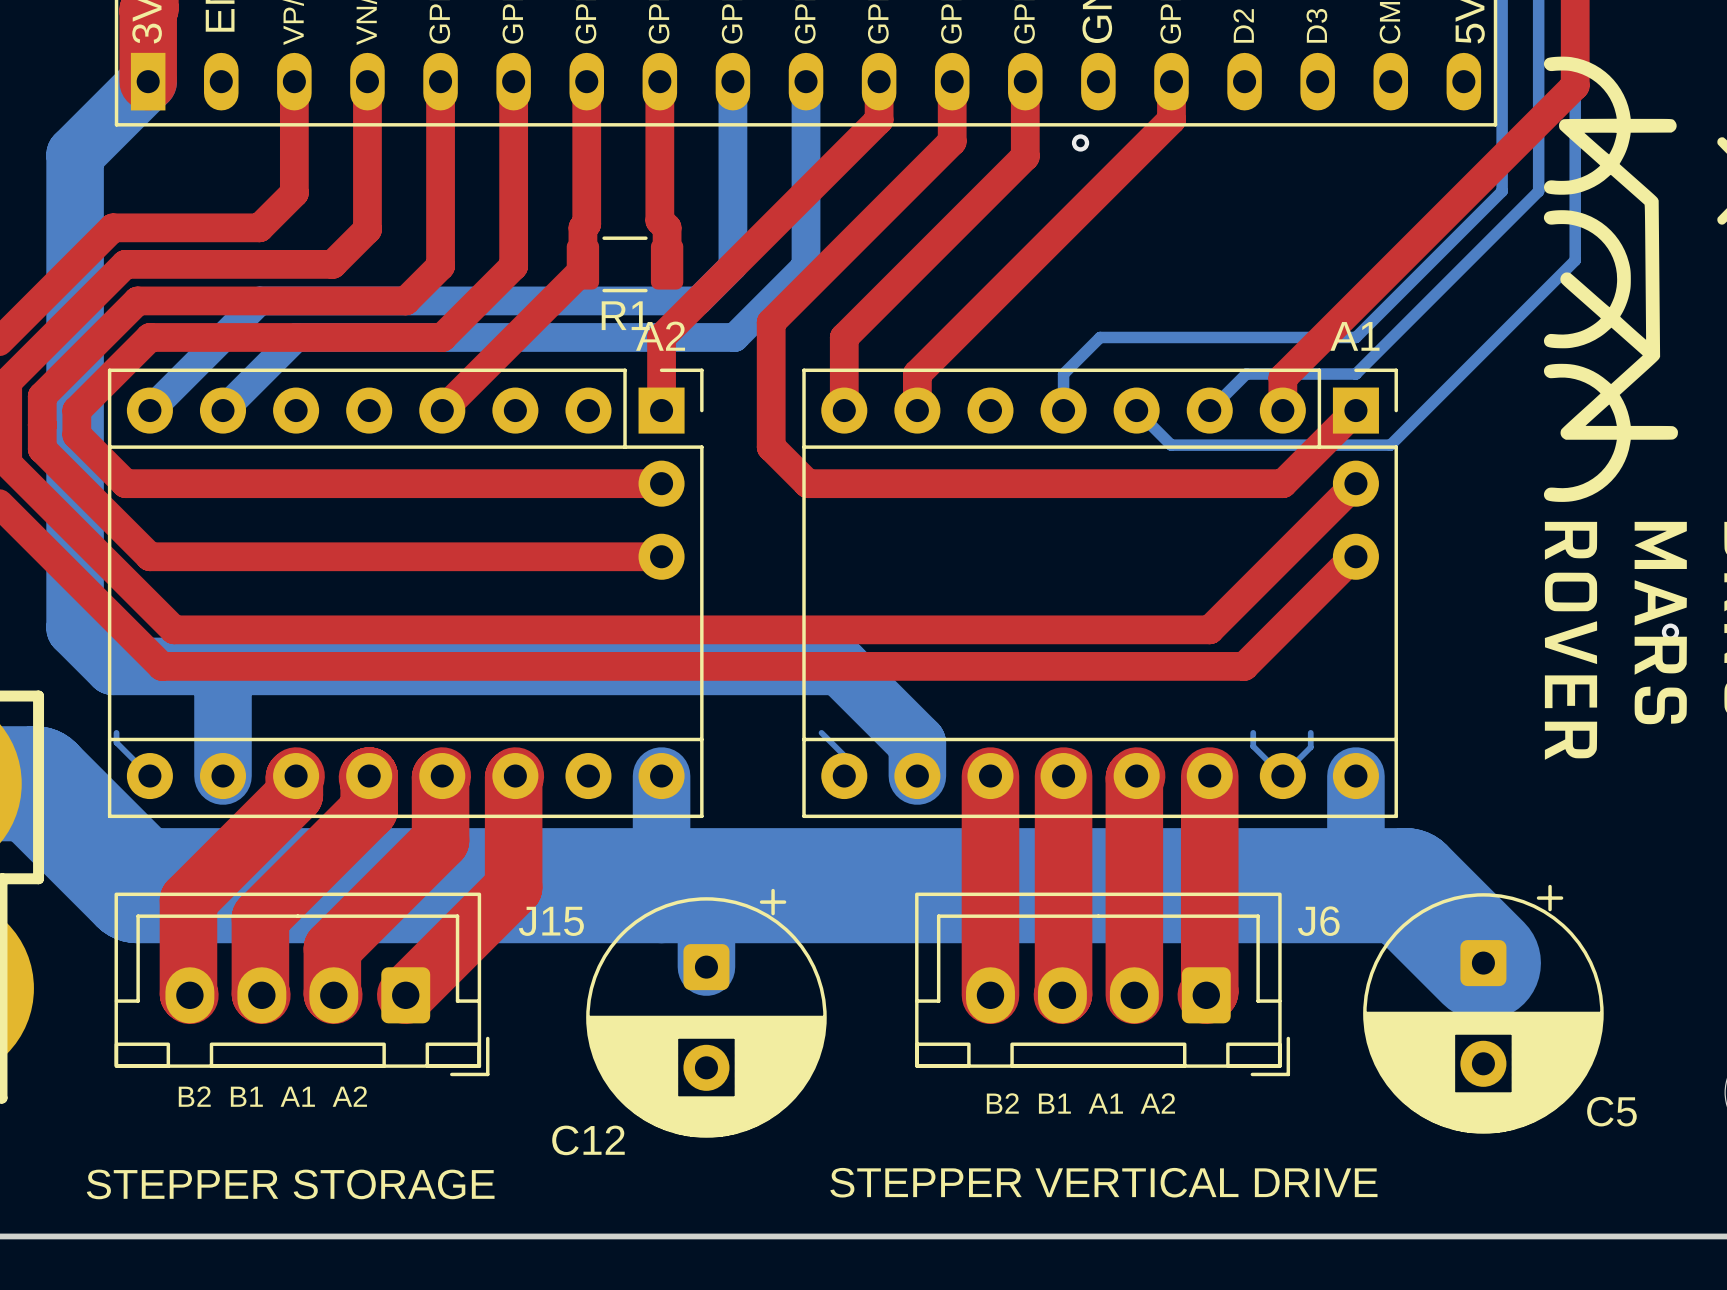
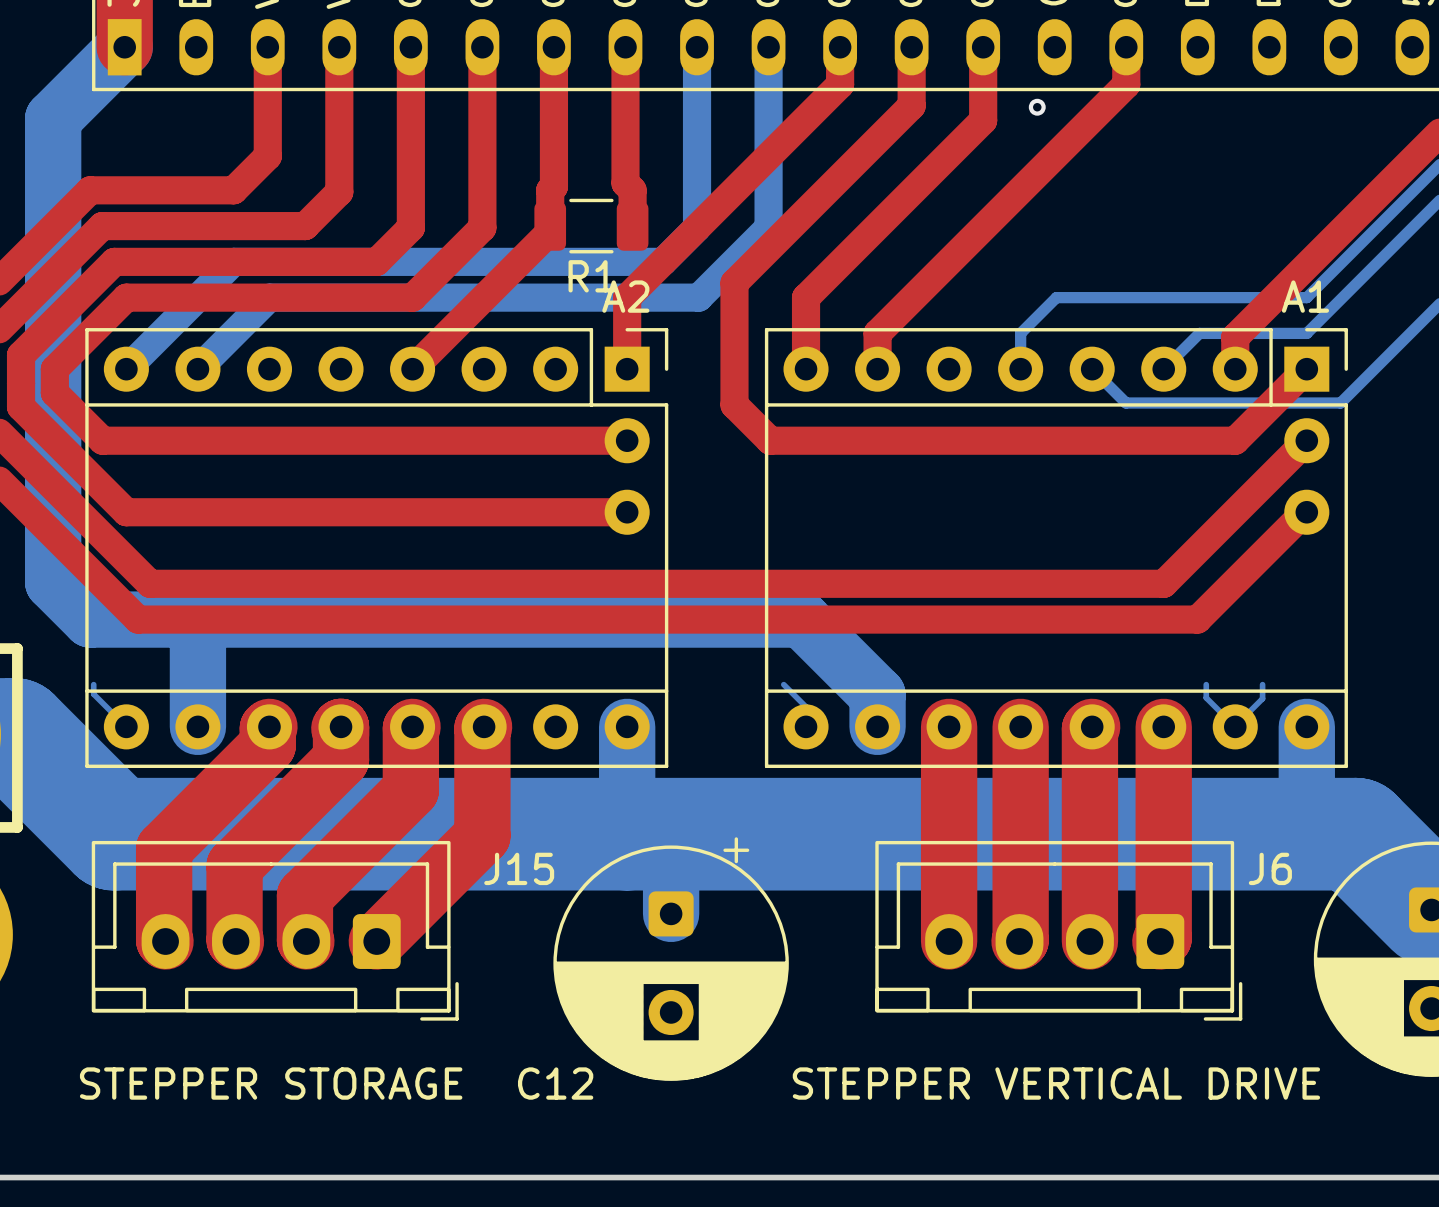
text: B2 B1 A1 A2 (272, 1096) -> none
text: B2 B1 A1 A2 (1080, 1103) -> none
J6 value position: STEPPER VERTICAL DRIVE (1103, 1182) -> STEPPER VERTICAL DRIVE (1056, 1083)
J15 value position: STEPPER STORAGE (290, 1184) -> STEPPER STORAGE (271, 1083)

